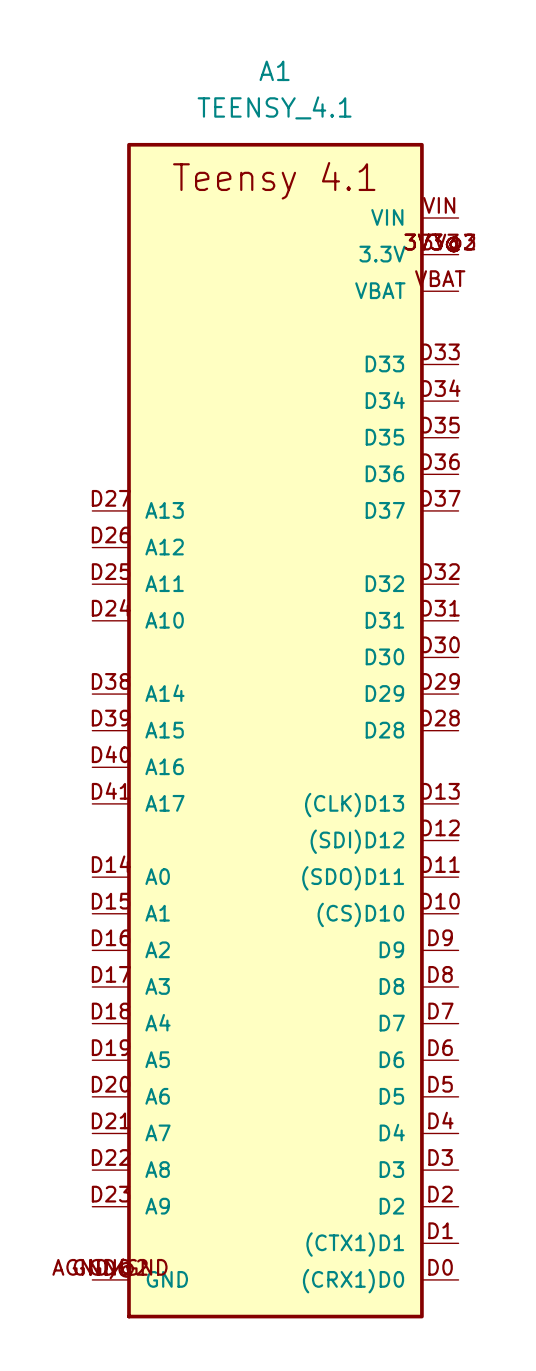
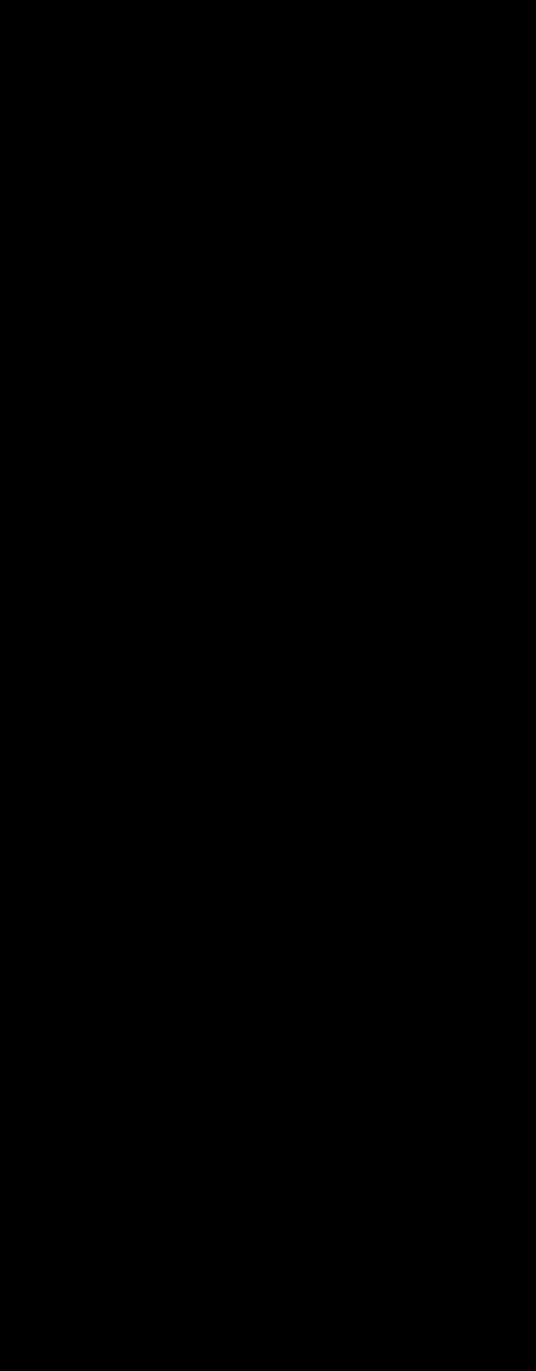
A1: TEENSY_4.1 (275, 730) -> none

